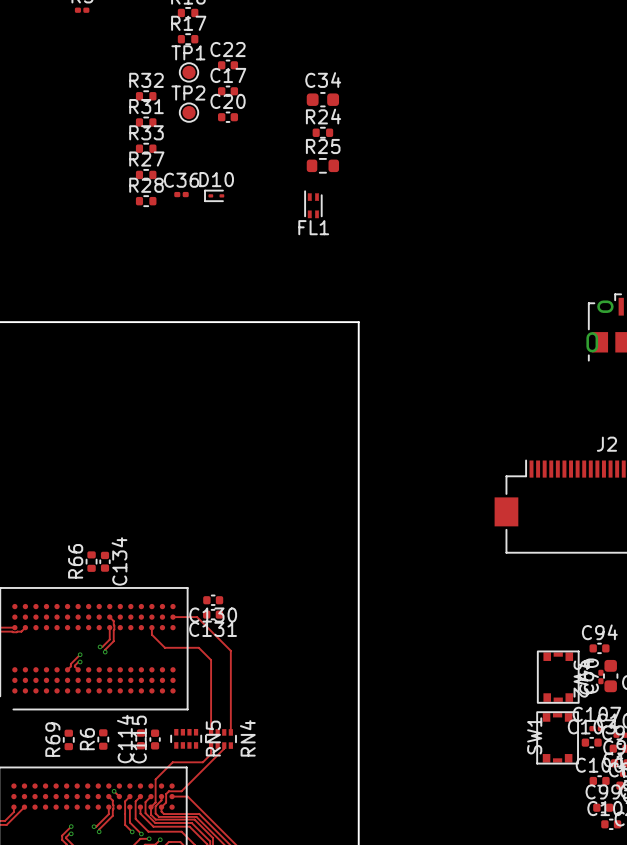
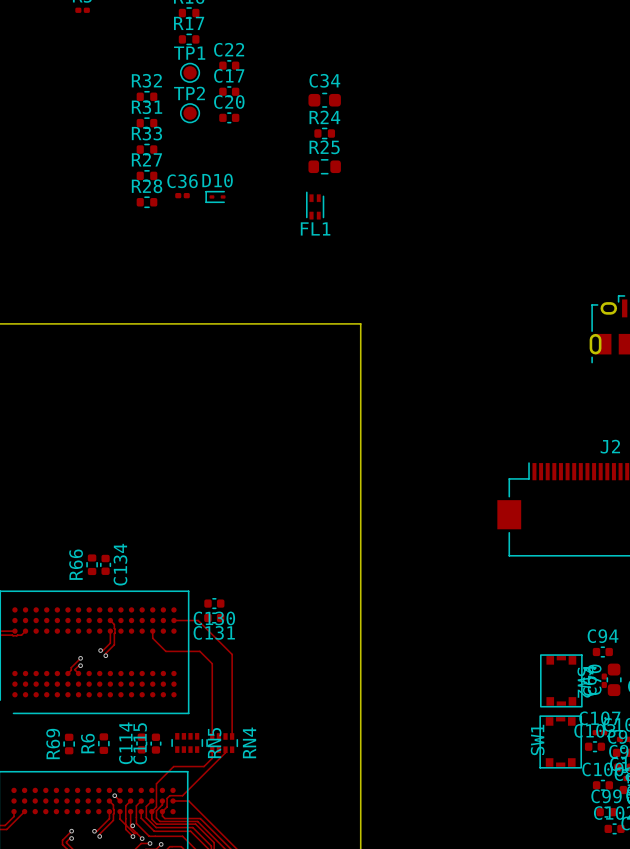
track: none -> (120, 811) (120, 819) (134, 833) (137, 833)
via: none -> (132, 825)

